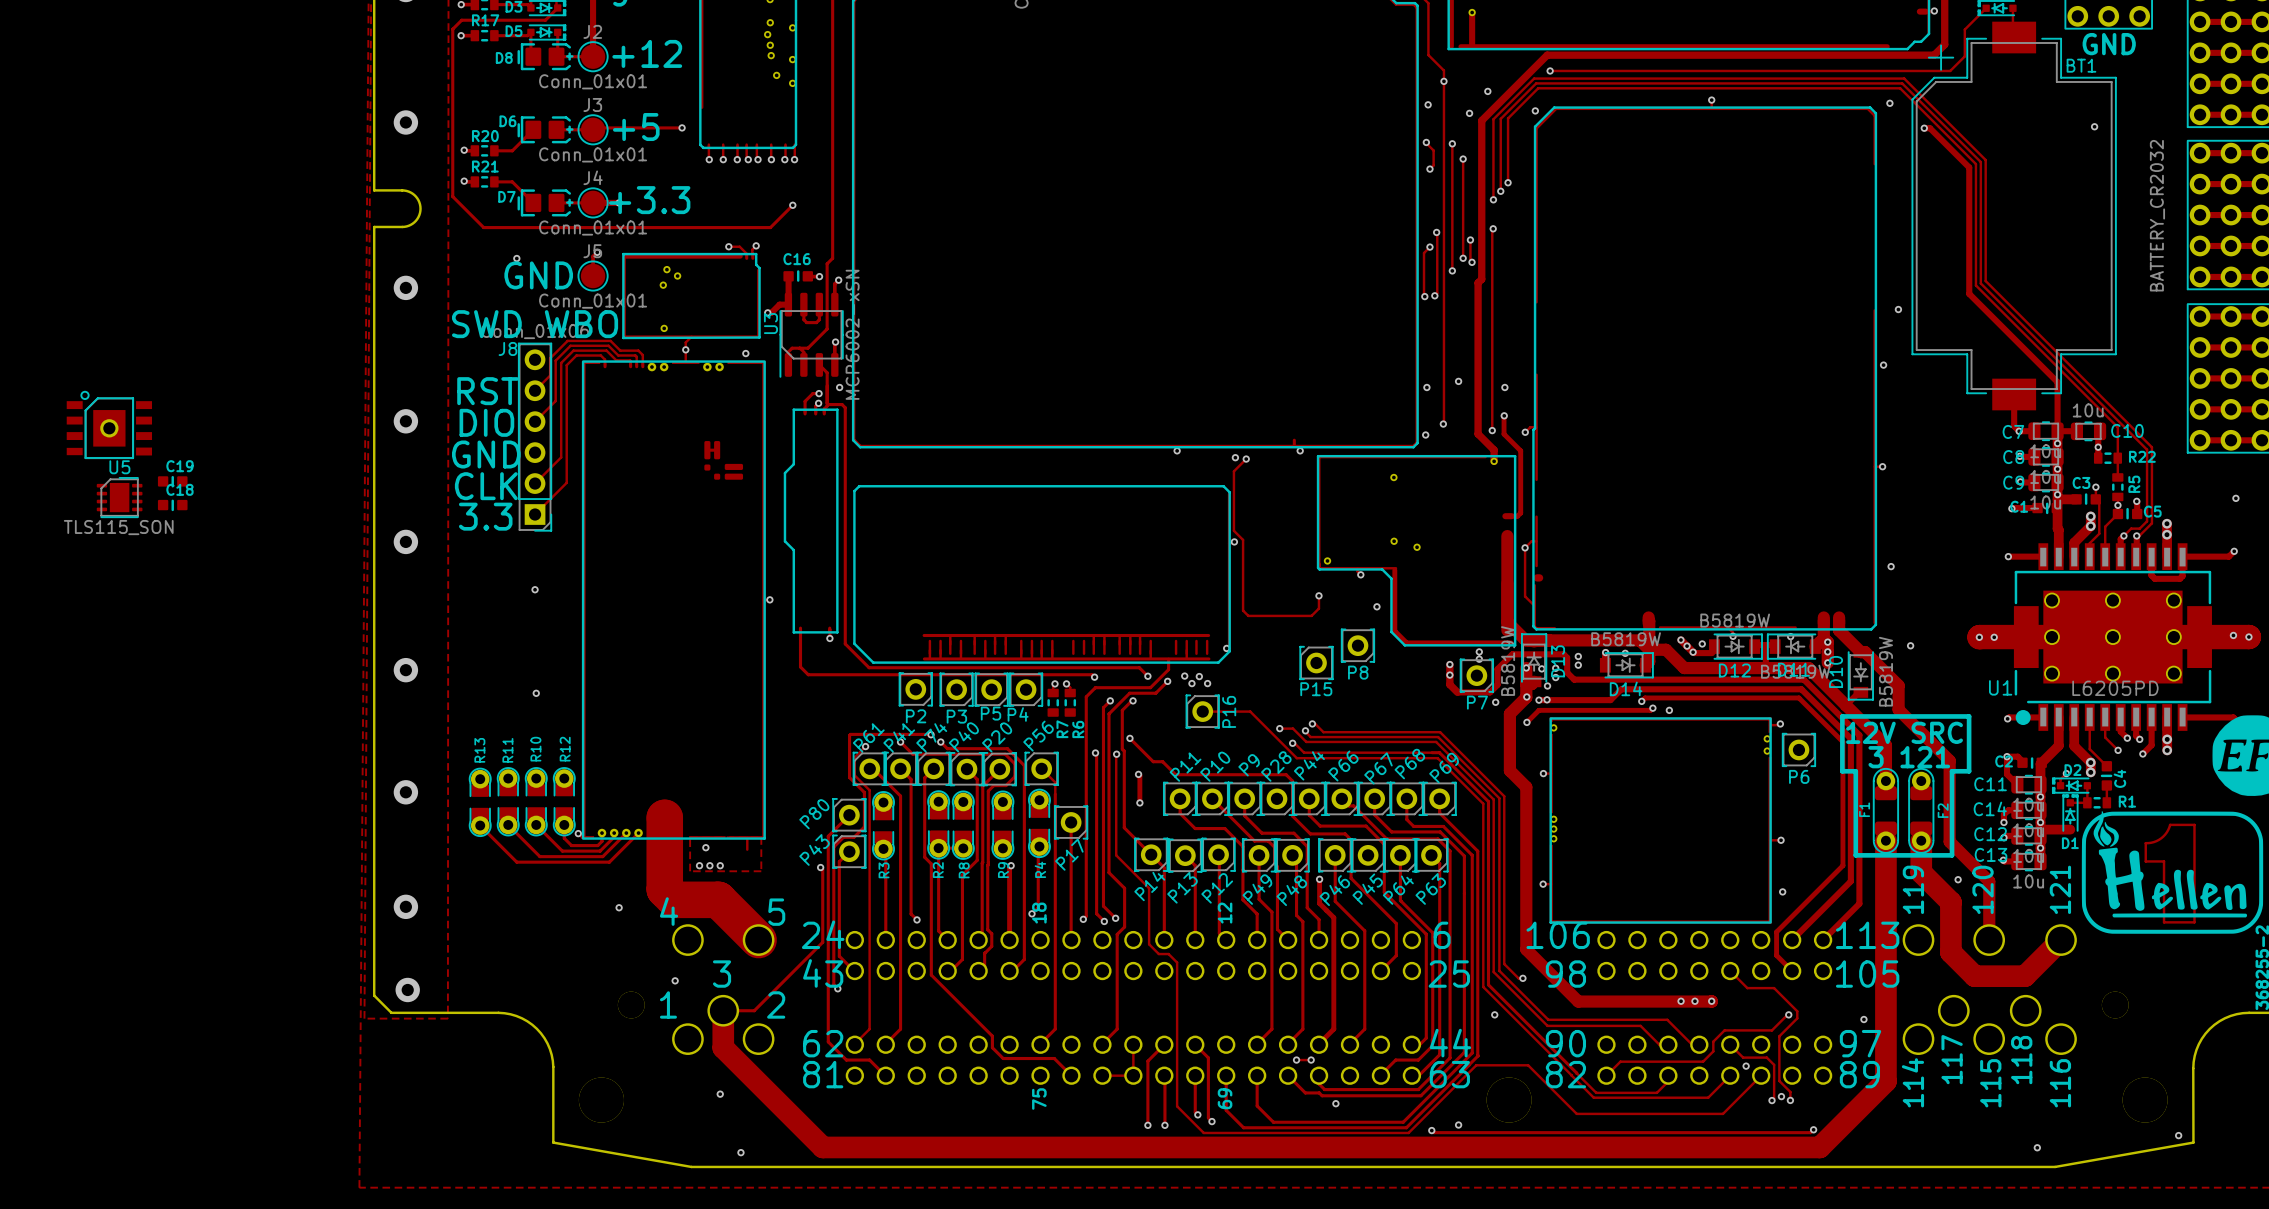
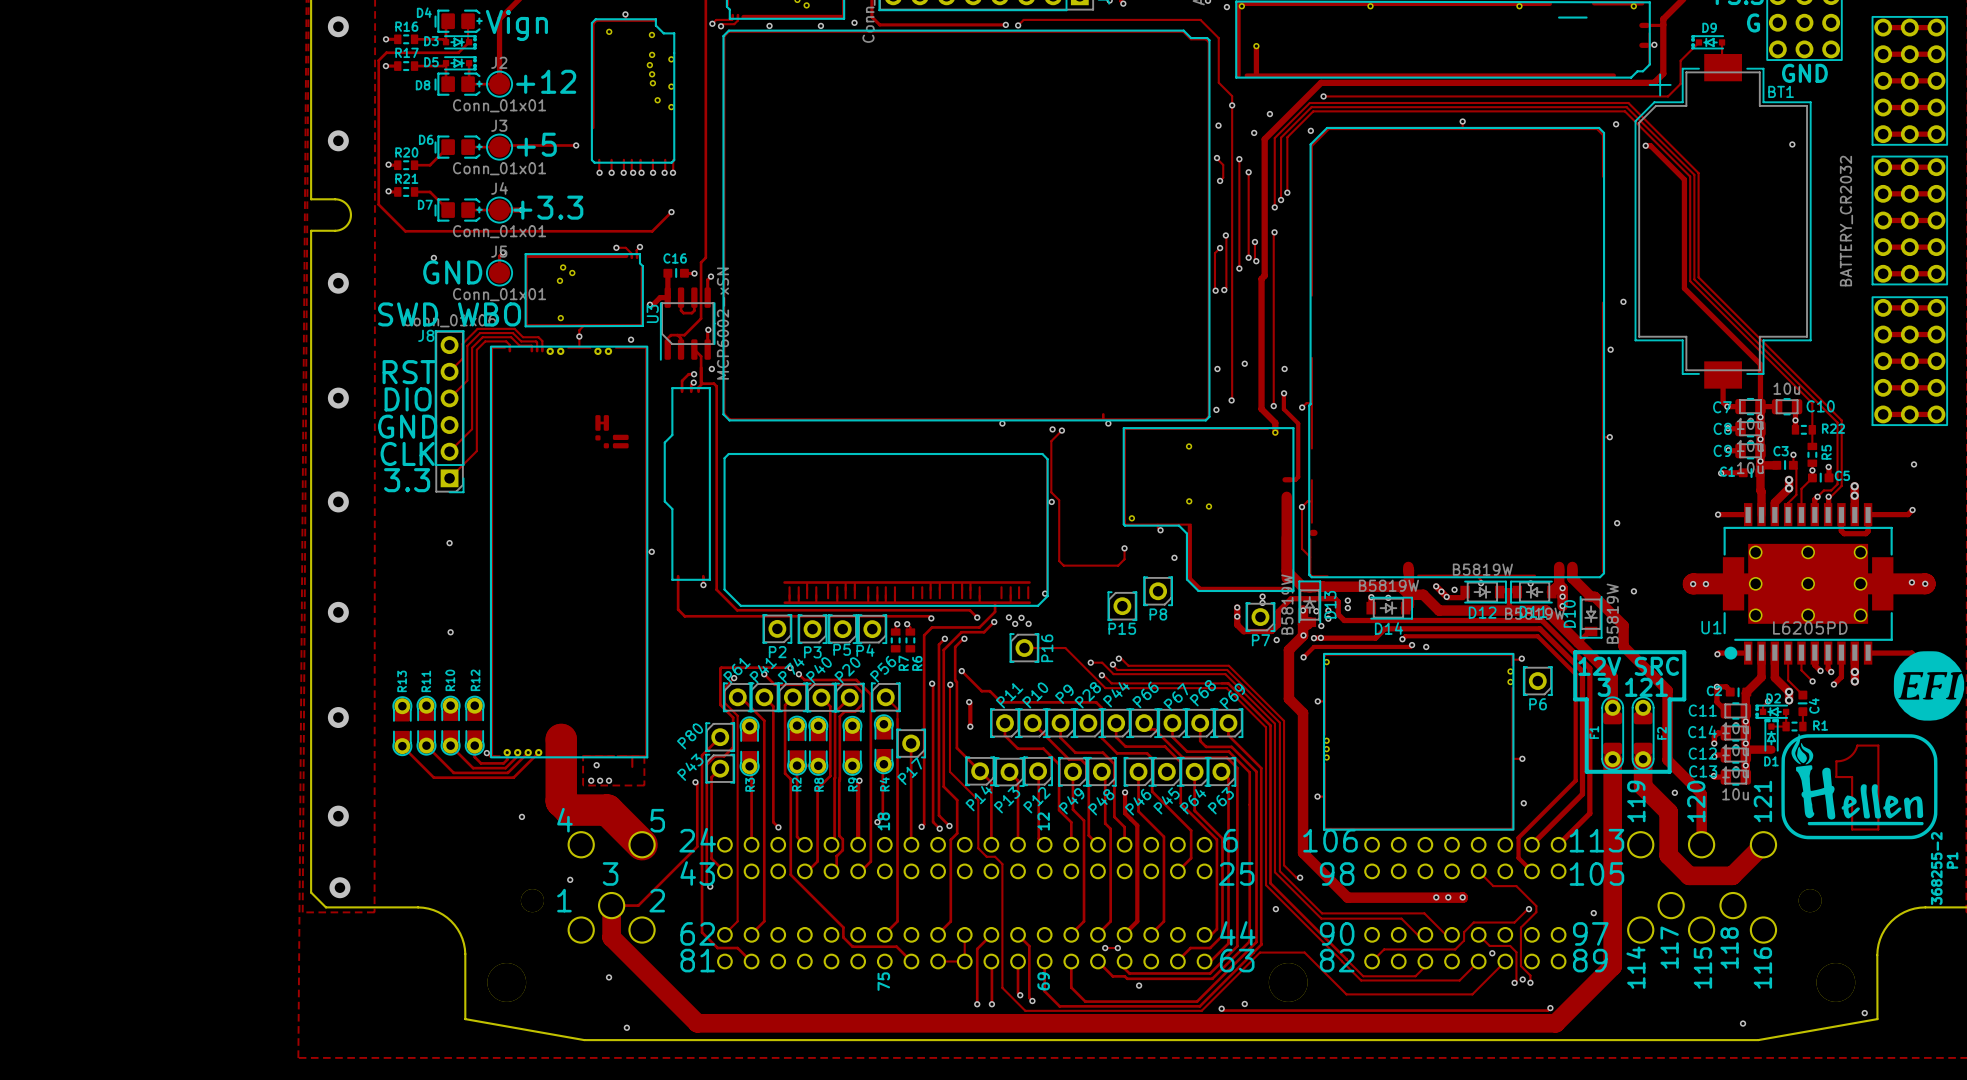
part: (109, 424) -> none
C19: (172, 481) -> none
U5: TLS115_SON (119, 497) -> none
C18: (172, 505) -> none

